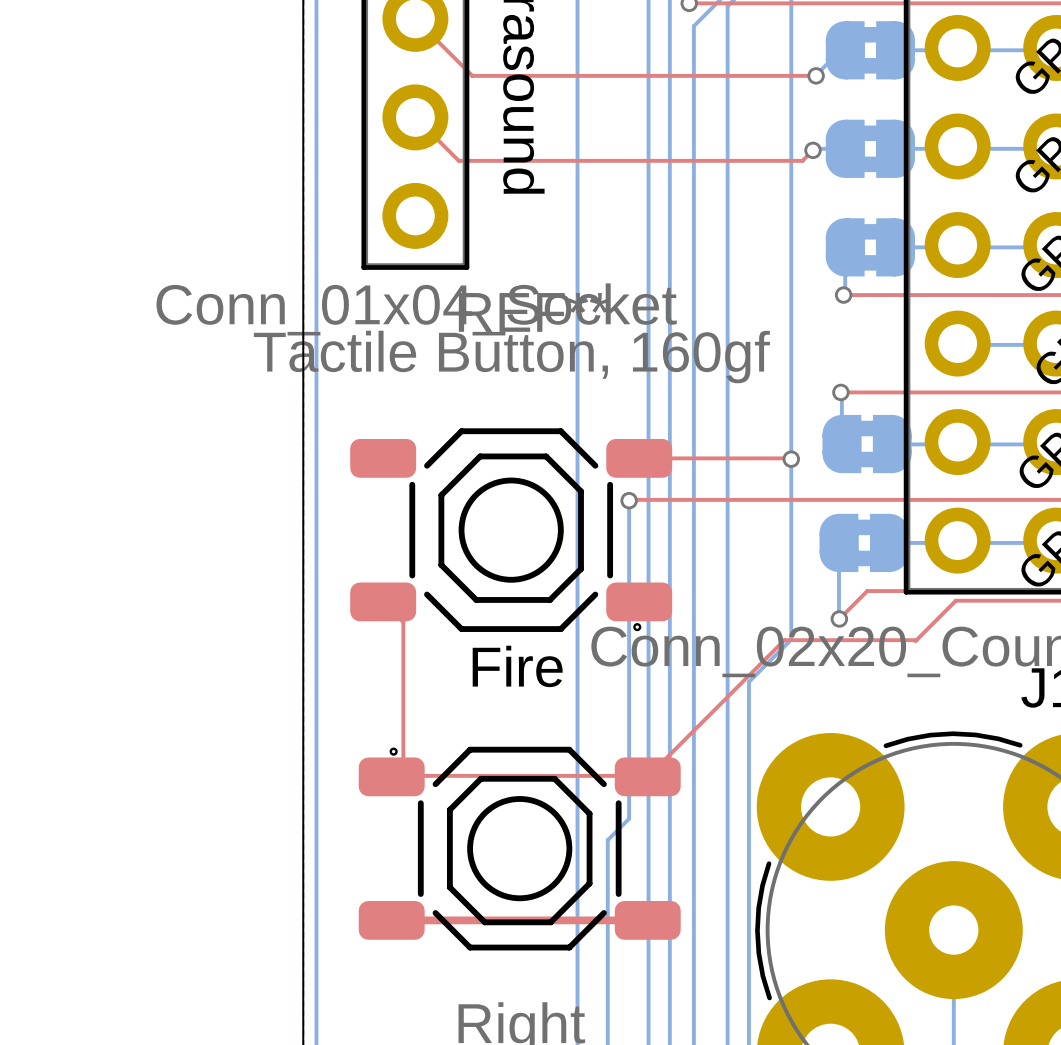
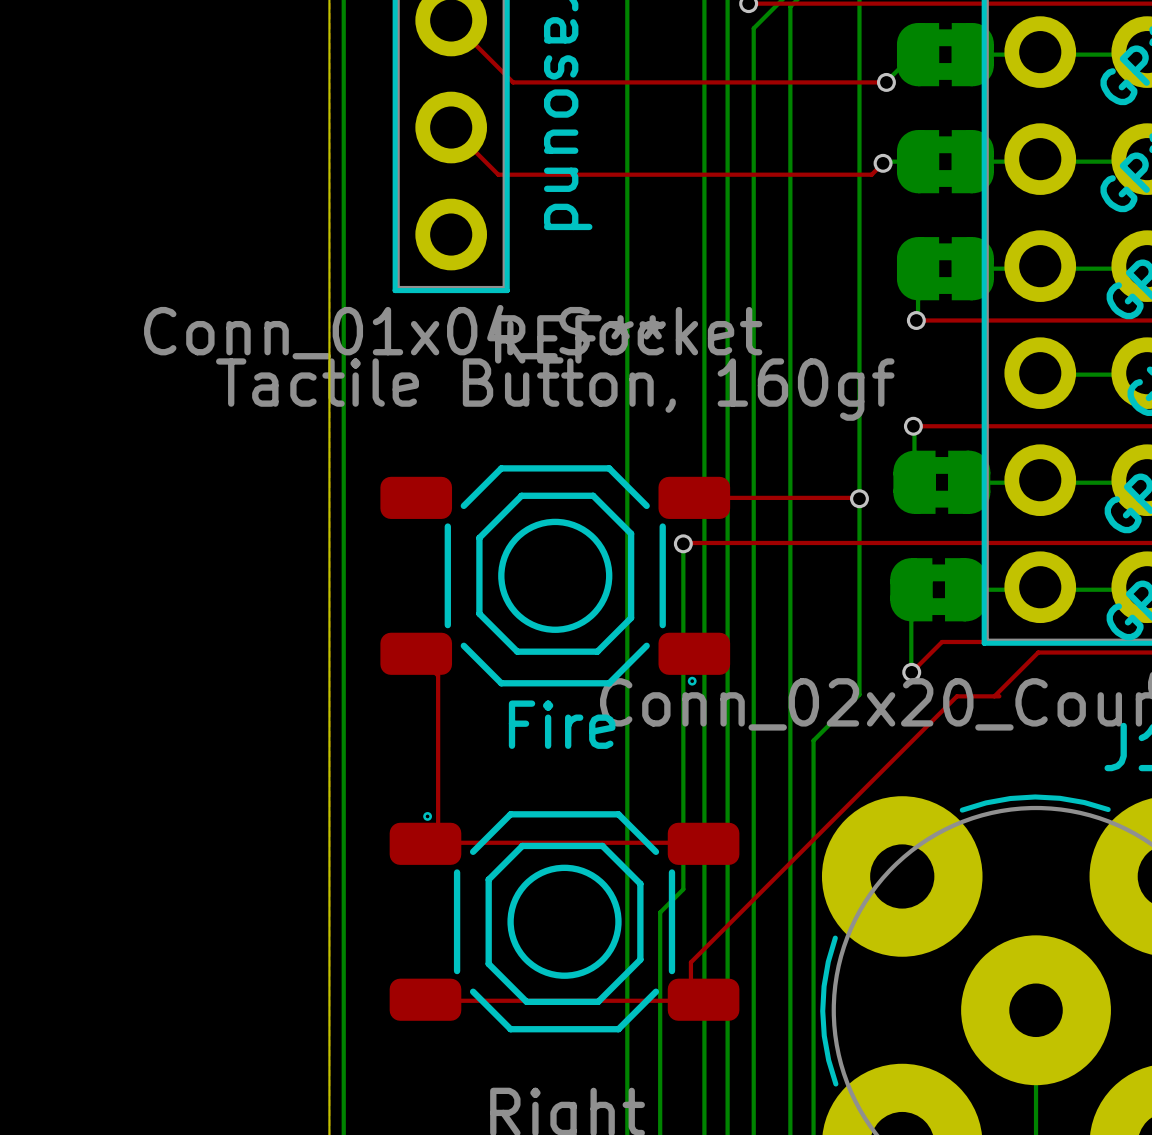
top track: (916, 640) (784, 640) (647, 776) -> none
top track: none -> (999, 696) (956, 696) (690, 962) (690, 1000) (438, 1000)
top track: (391, 920) (647, 920) -> none

